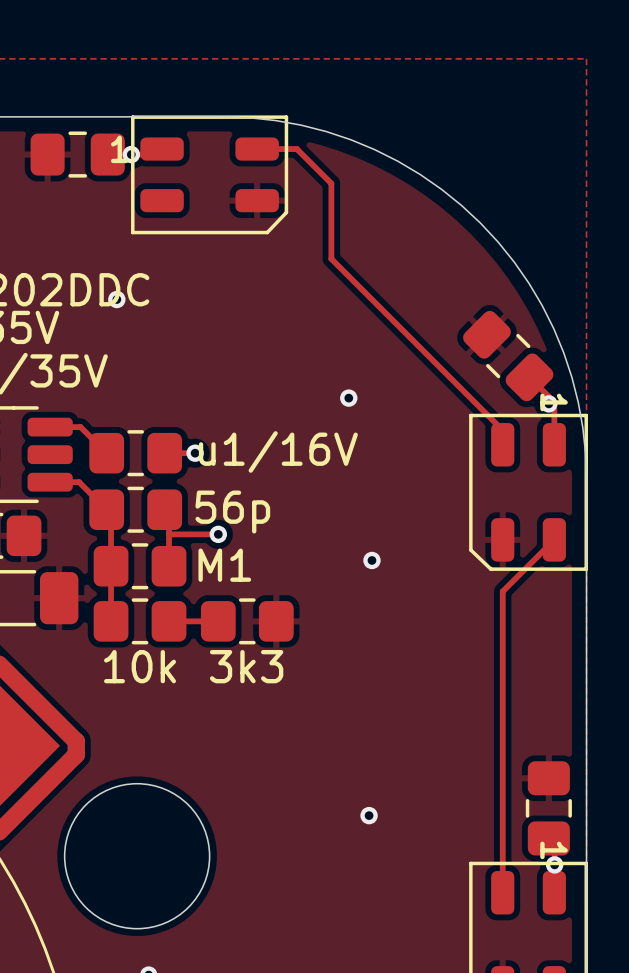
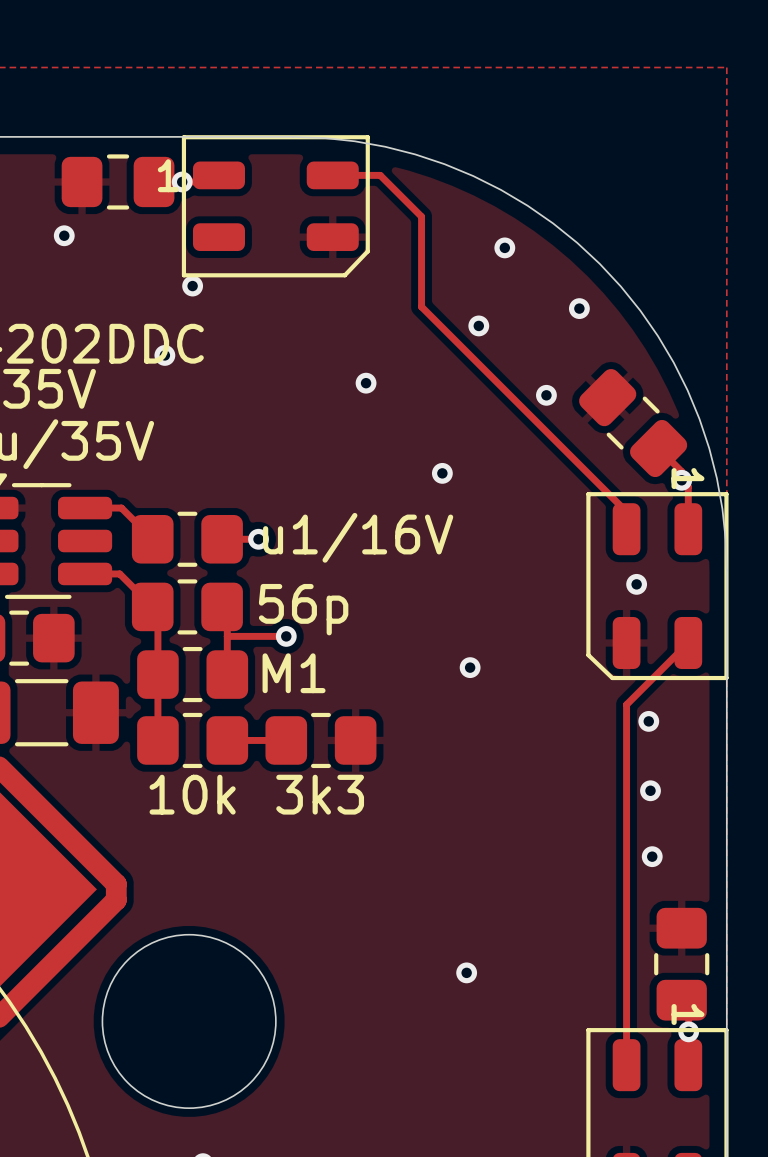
via: none -> (64, 235)
via: none -> (504, 247)
via: none -> (192, 286)
via: none -> (579, 308)
via: none -> (478, 325)
via: none -> (366, 383)
via: none -> (546, 395)
via: none -> (636, 584)
via: none -> (648, 721)
via: none -> (650, 790)
via: none -> (652, 856)

